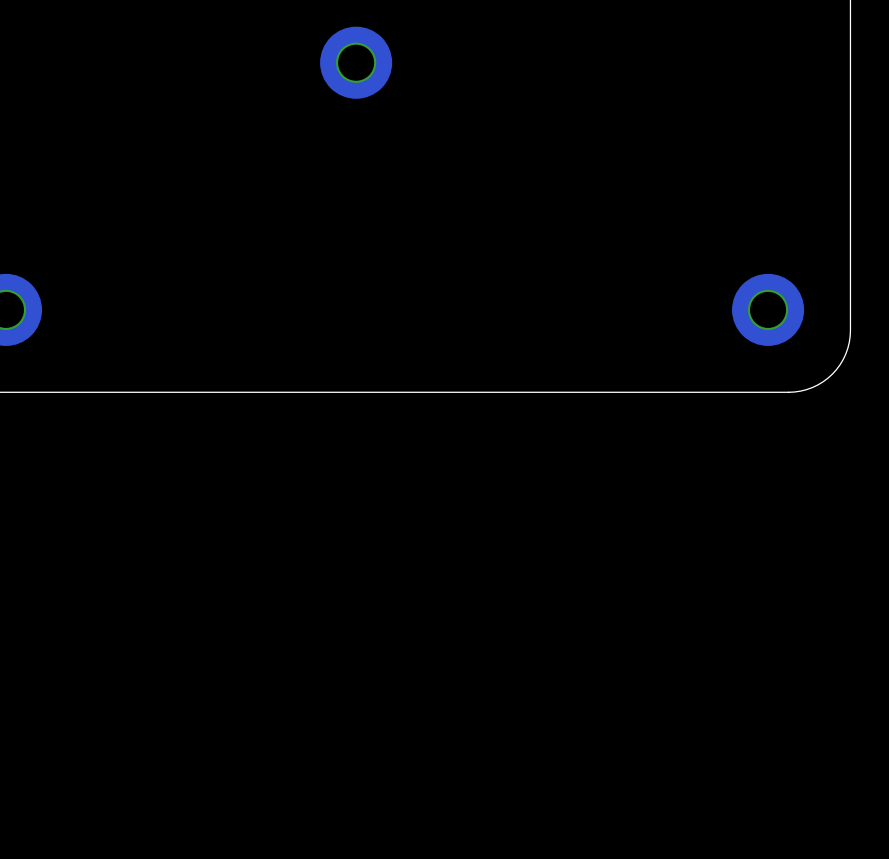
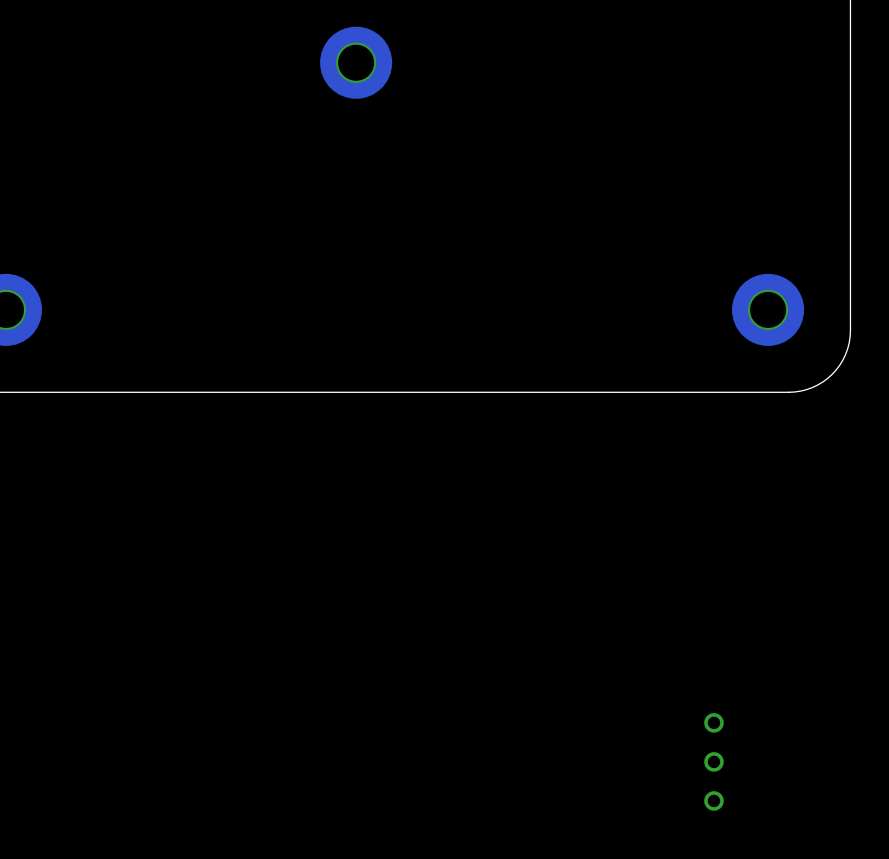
part: none -> (713, 722)
part: none -> (713, 761)
part: none -> (713, 800)

